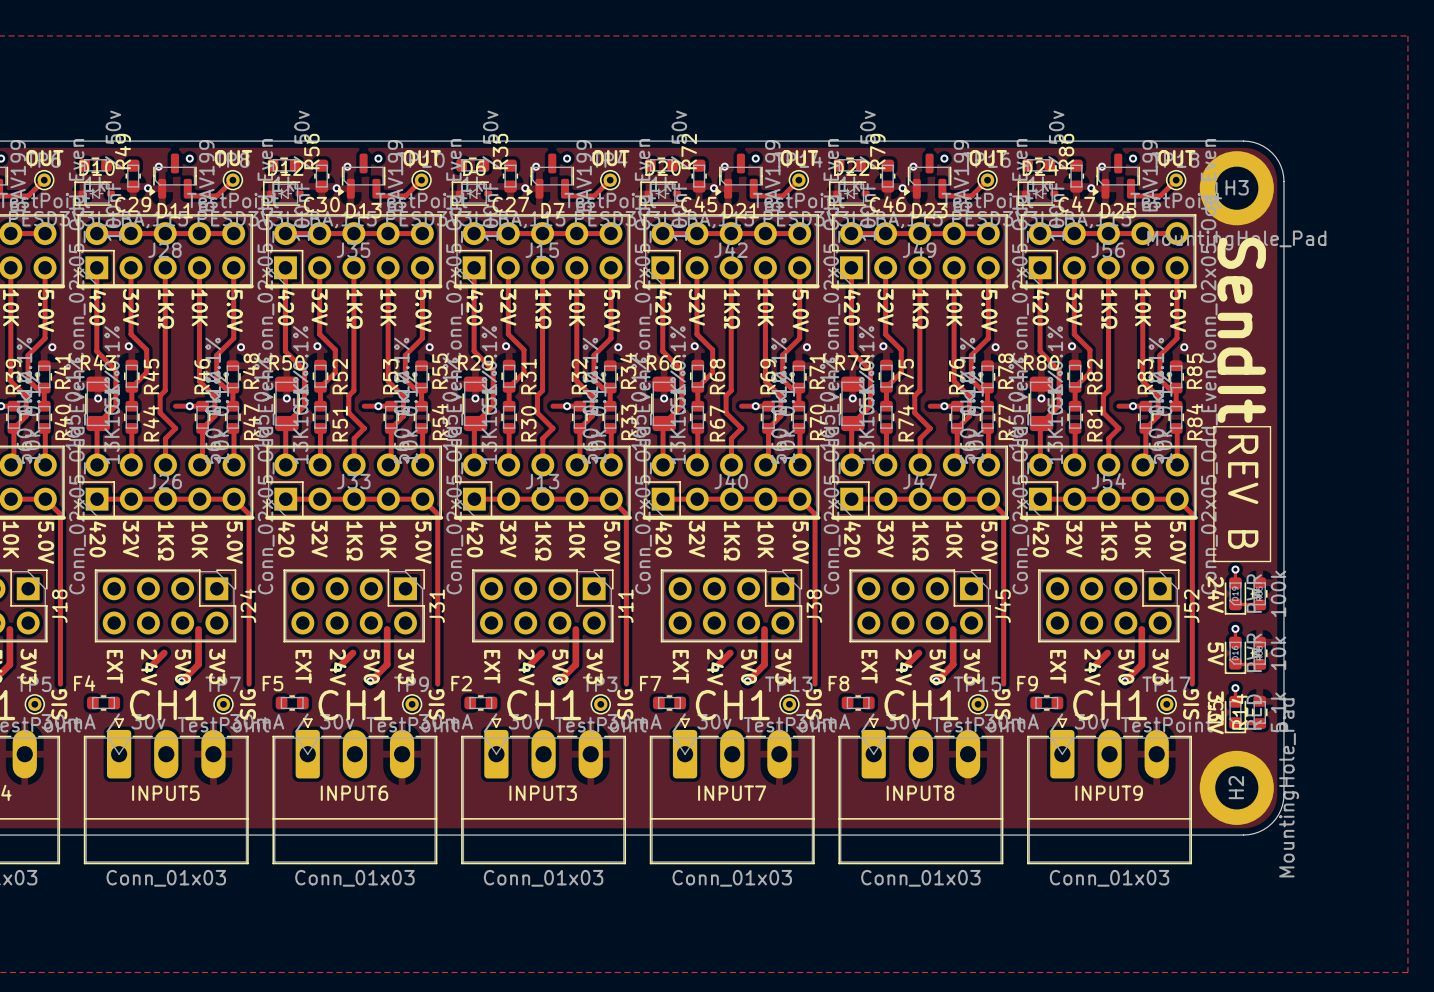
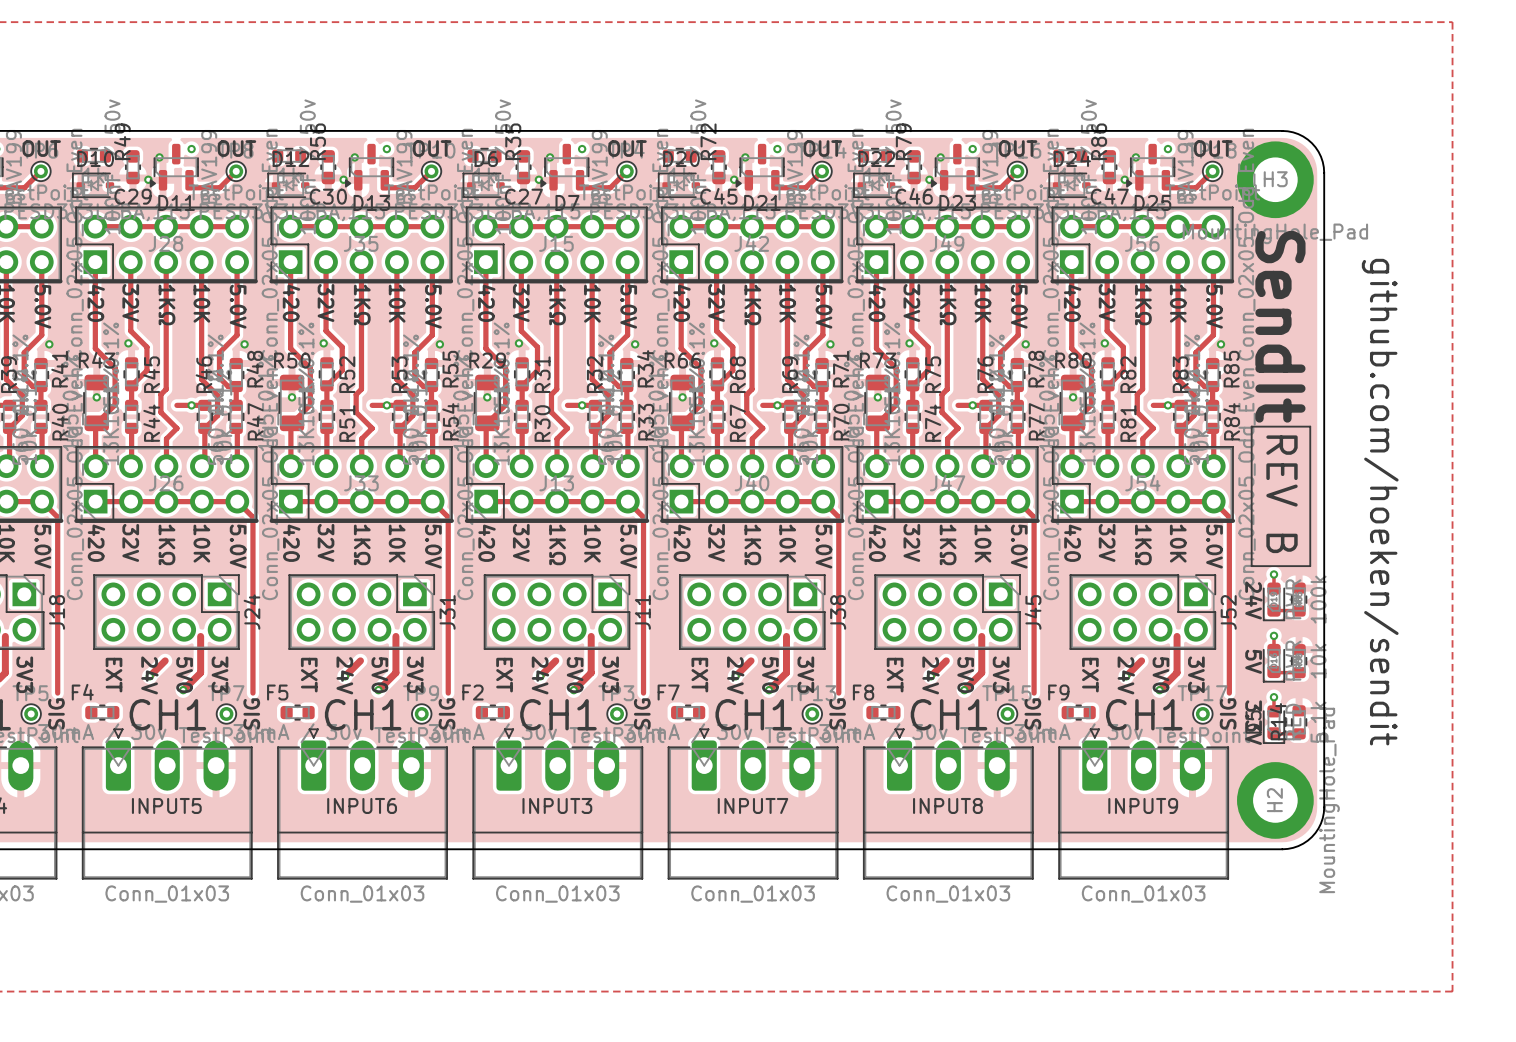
text: none -> github.com/hoeken/sendit (1380, 502)

